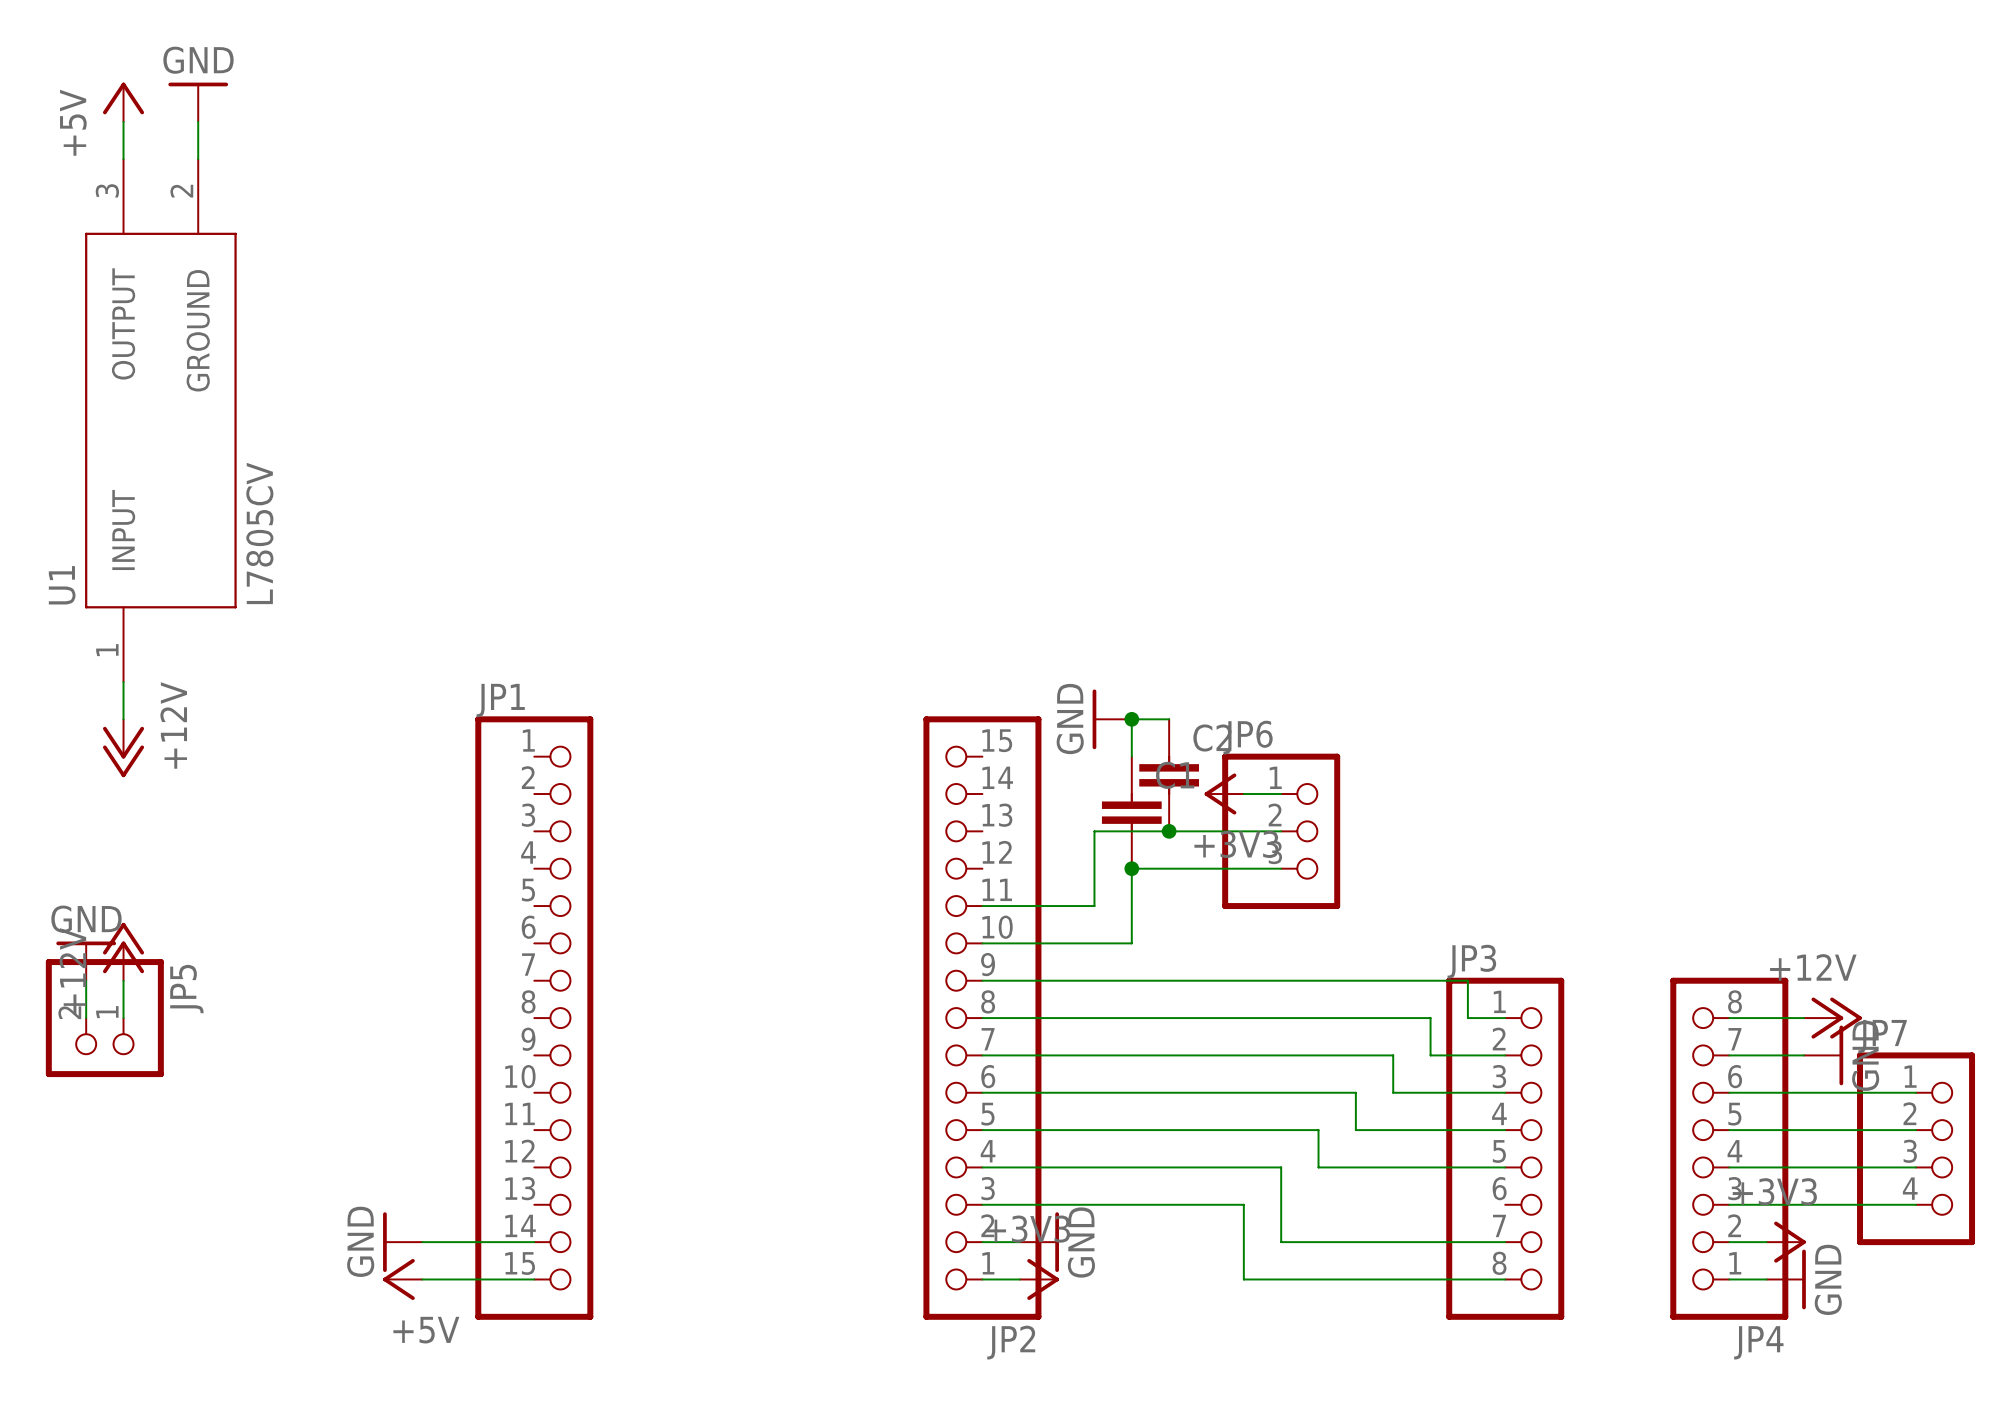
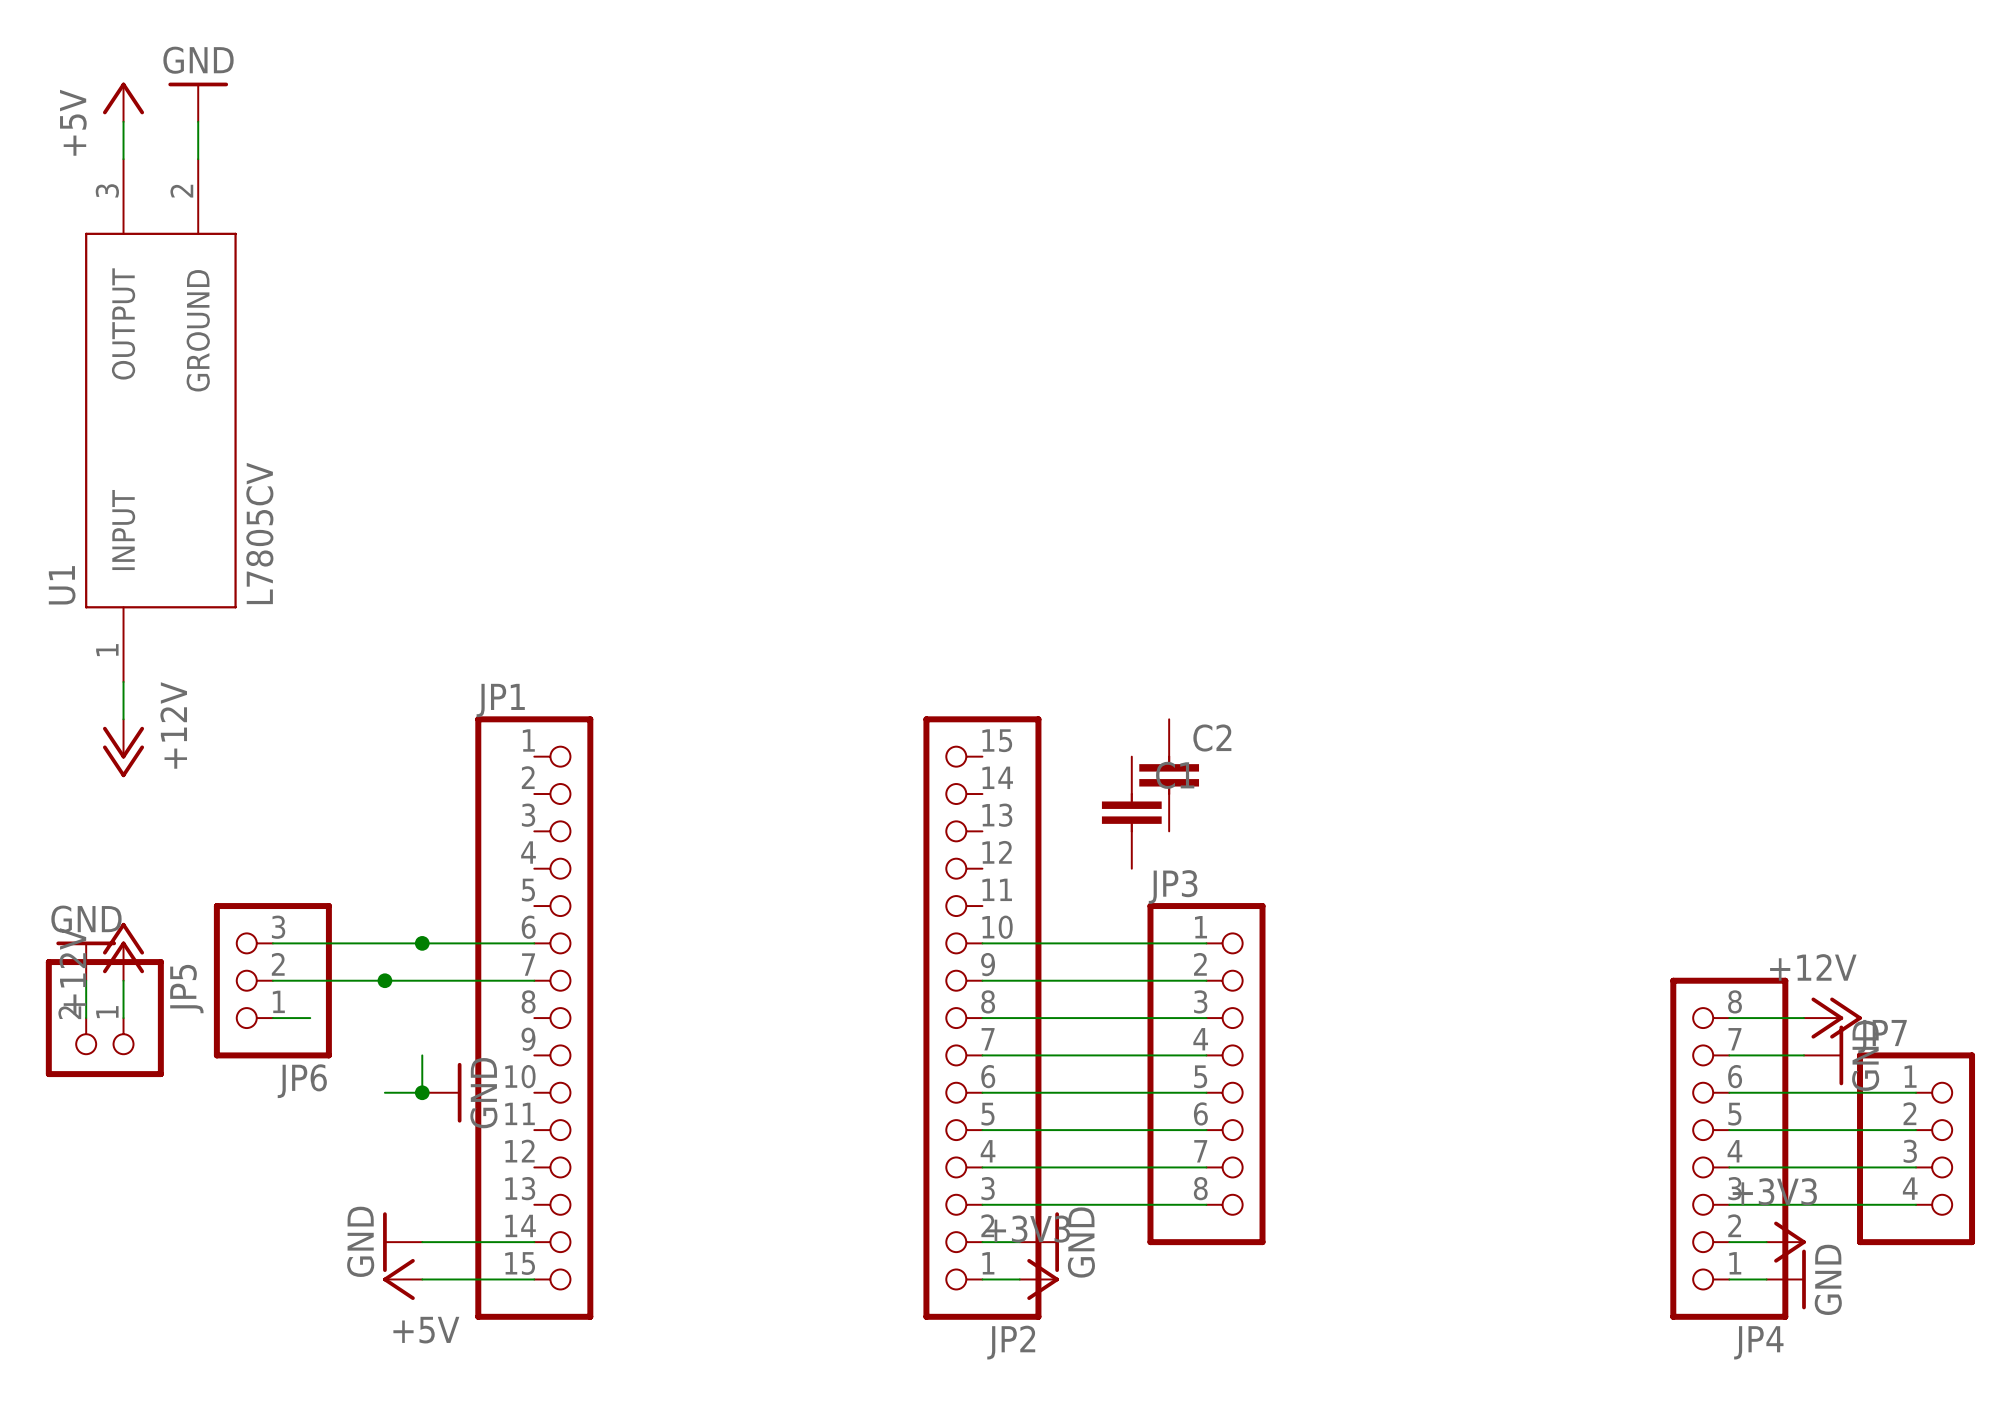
power symbol: GND (1112, 719) -> none
junction: (1131, 719) -> none
wire: (1169, 719) (1131, 719) (1131, 756) -> none
power symbol: +3V3 (1224, 794) -> none
wire: (1243, 794) (1281, 794) -> none
junction: (1169, 831) -> none
wire: (1281, 831) (1094, 831) (1094, 906) (982, 906) -> none
JP6 rotation: 0° (1281, 831) -> 180° (272, 980)
JP6 position: (1281, 831) -> (272, 980)
junction: (1131, 868) -> none
wire: (1281, 868) (1131, 868) (1131, 943) -> (1206, 943) (1131, 943)
wire: none -> (272, 943) (534, 943)
junction: none -> (422, 943)
wire: none -> (272, 980) (534, 980)
junction: none -> (384, 980)
wire: (1206, 980) (1467, 980) (1467, 1018) (1505, 1018) -> none
wire: none -> (272, 1018) (310, 1018)
wire: (1206, 1018) (1430, 1018) (1430, 1055) (1505, 1055) -> none
wire: none -> (422, 1055) (422, 1092) (384, 1092)
wire: (1206, 1055) (1393, 1055) (1393, 1092) (1505, 1092) -> none
junction: none -> (422, 1092)
power symbol: none -> GND (441, 1092)
wire: (1206, 1092) (1355, 1092) (1355, 1130) (1505, 1130) -> none
wire: (1206, 1130) (1318, 1130) (1318, 1167) (1505, 1167) -> none
JP3 position: (1505, 1148) -> (1206, 1074)
wire: (1206, 1167) (1281, 1167) (1281, 1242) (1505, 1242) -> none
wire: (1206, 1204) (1243, 1204) (1243, 1279) (1505, 1279) -> none

